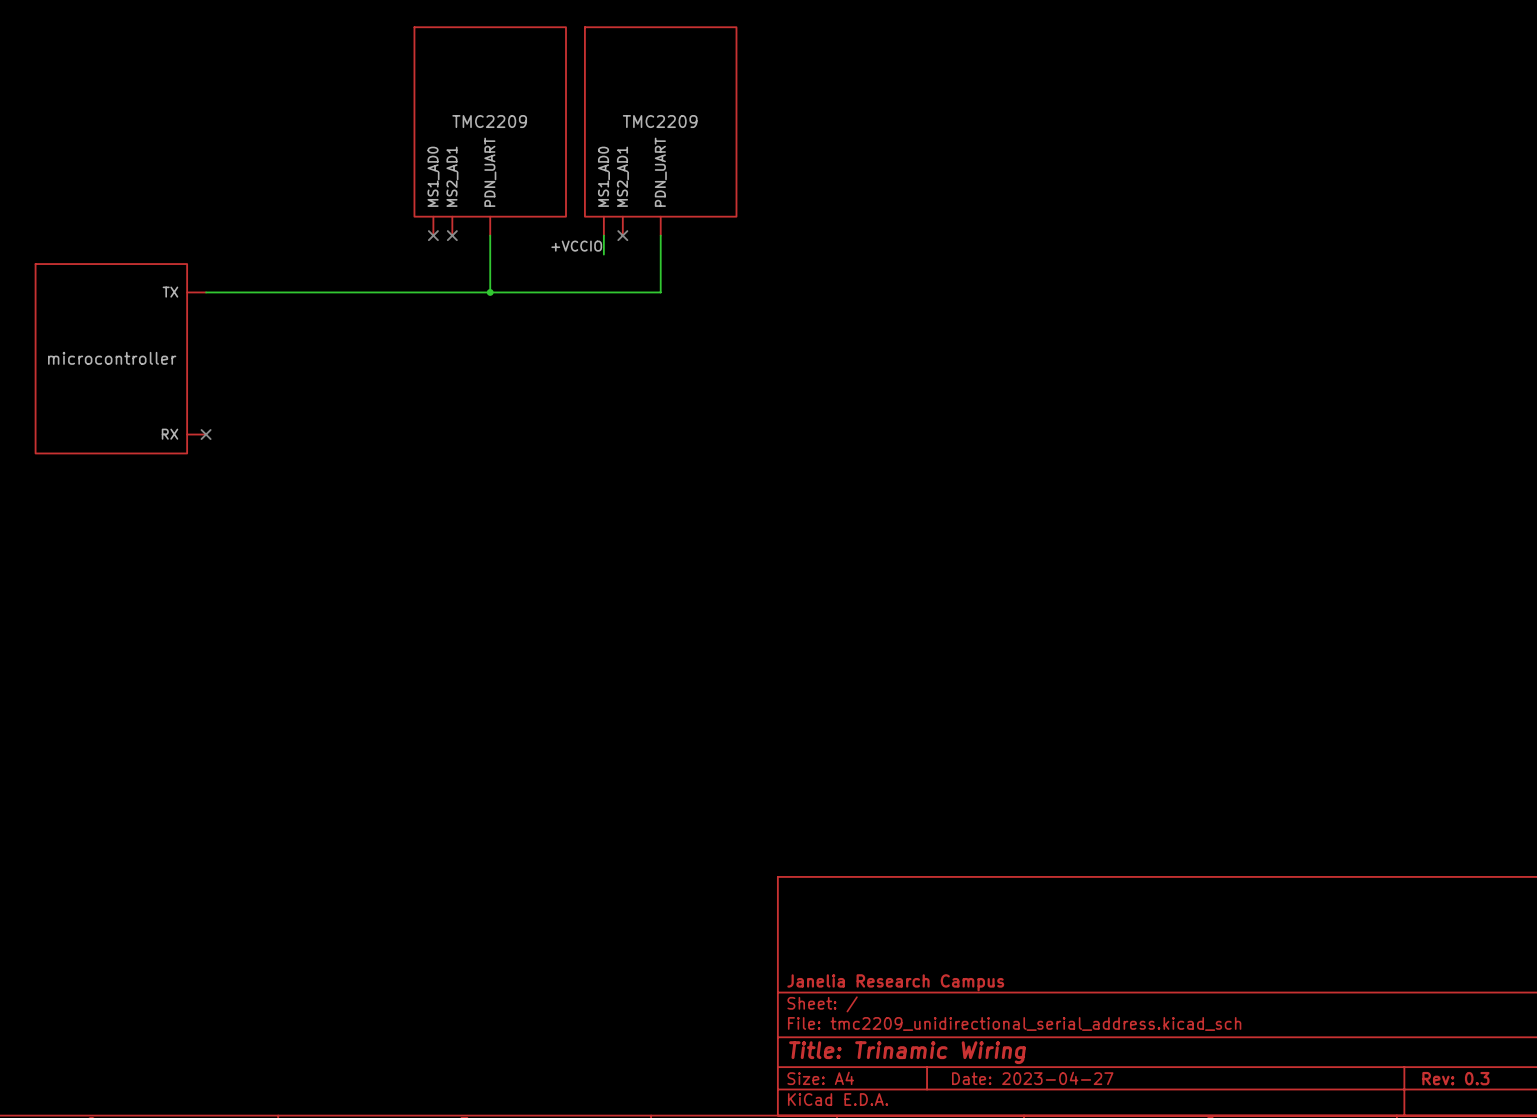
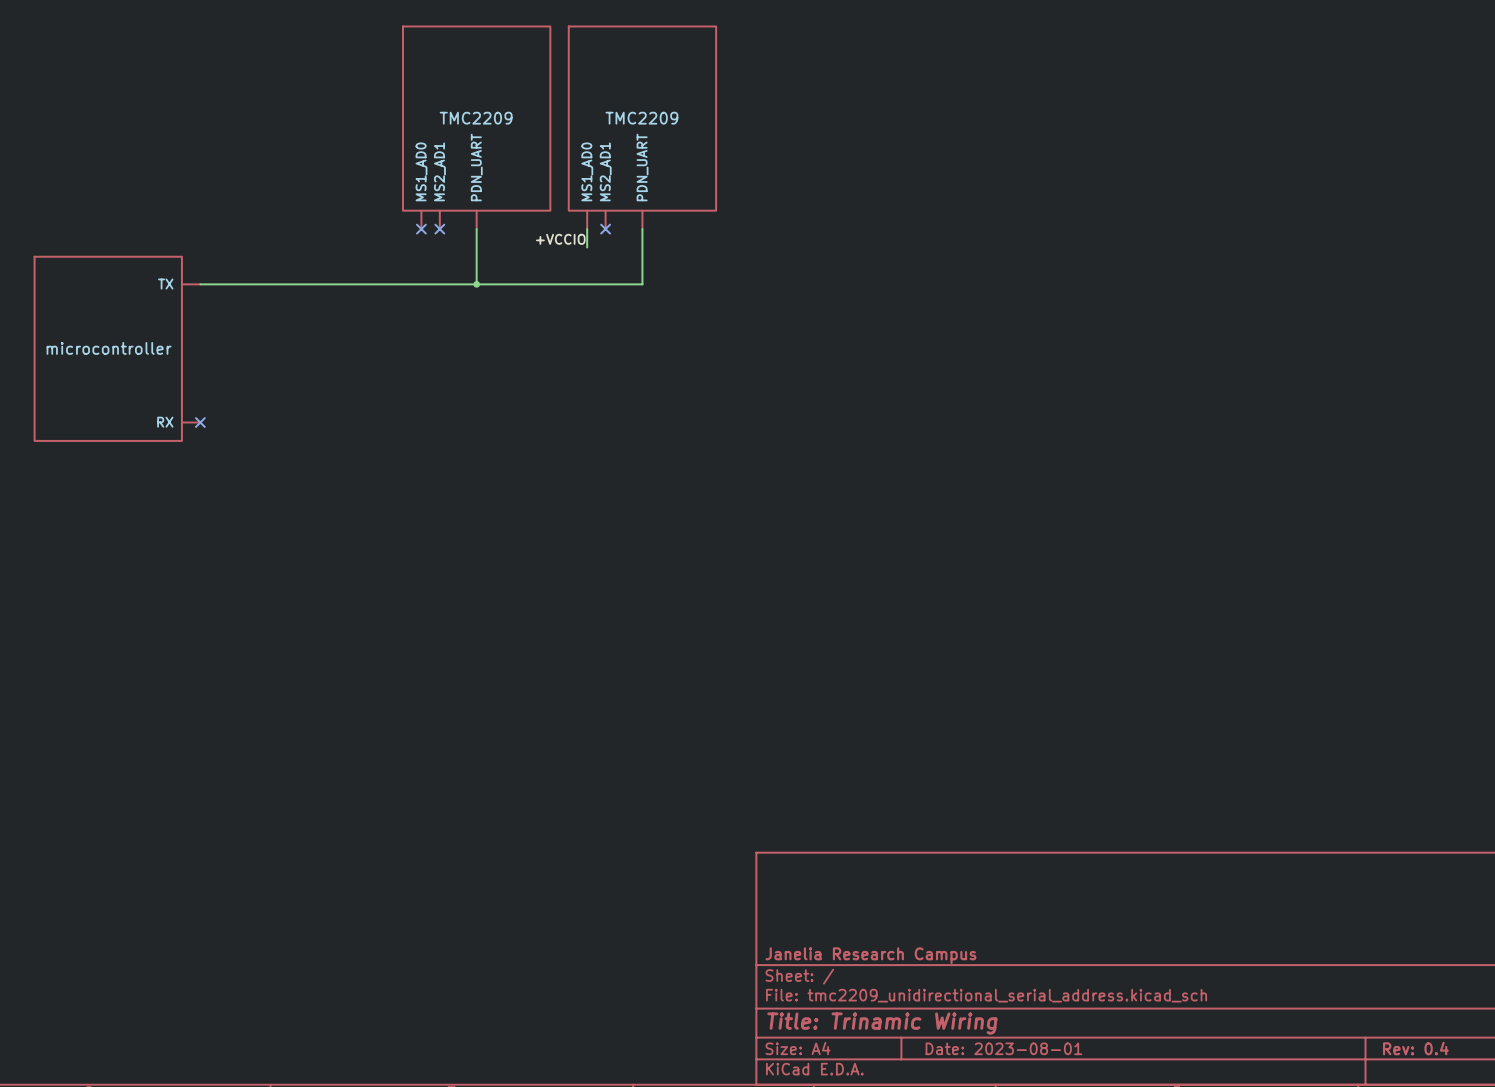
title block: Date: 2023-04-27 (1032, 1078) -> Date: 2023-08-01 (1003, 1048)
title block: Rev: 0.3 (1455, 1078) -> Rev: 0.4 (1415, 1048)

